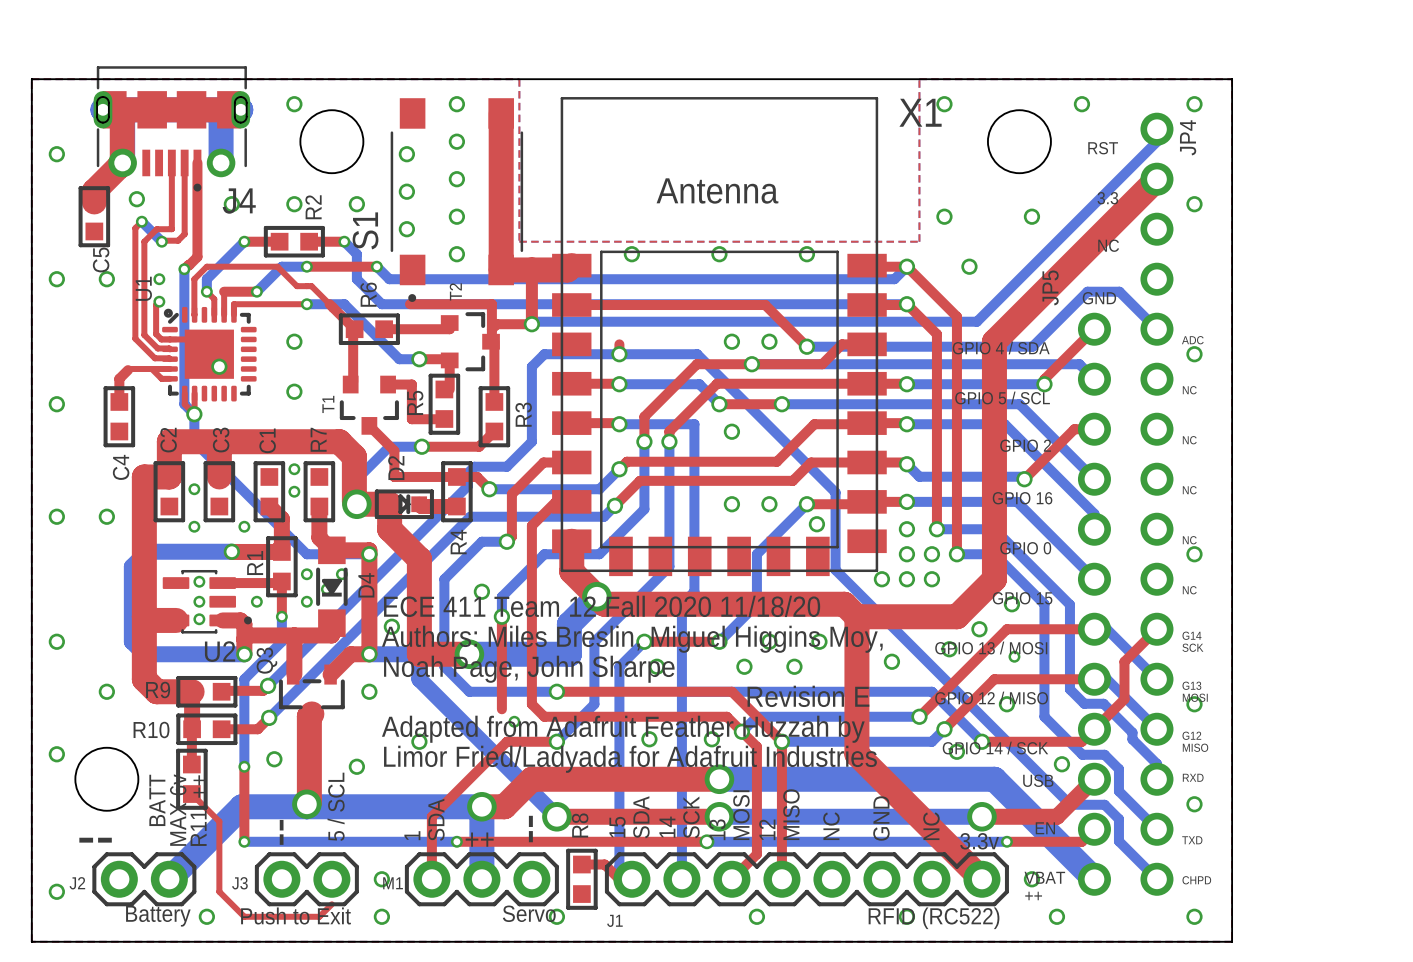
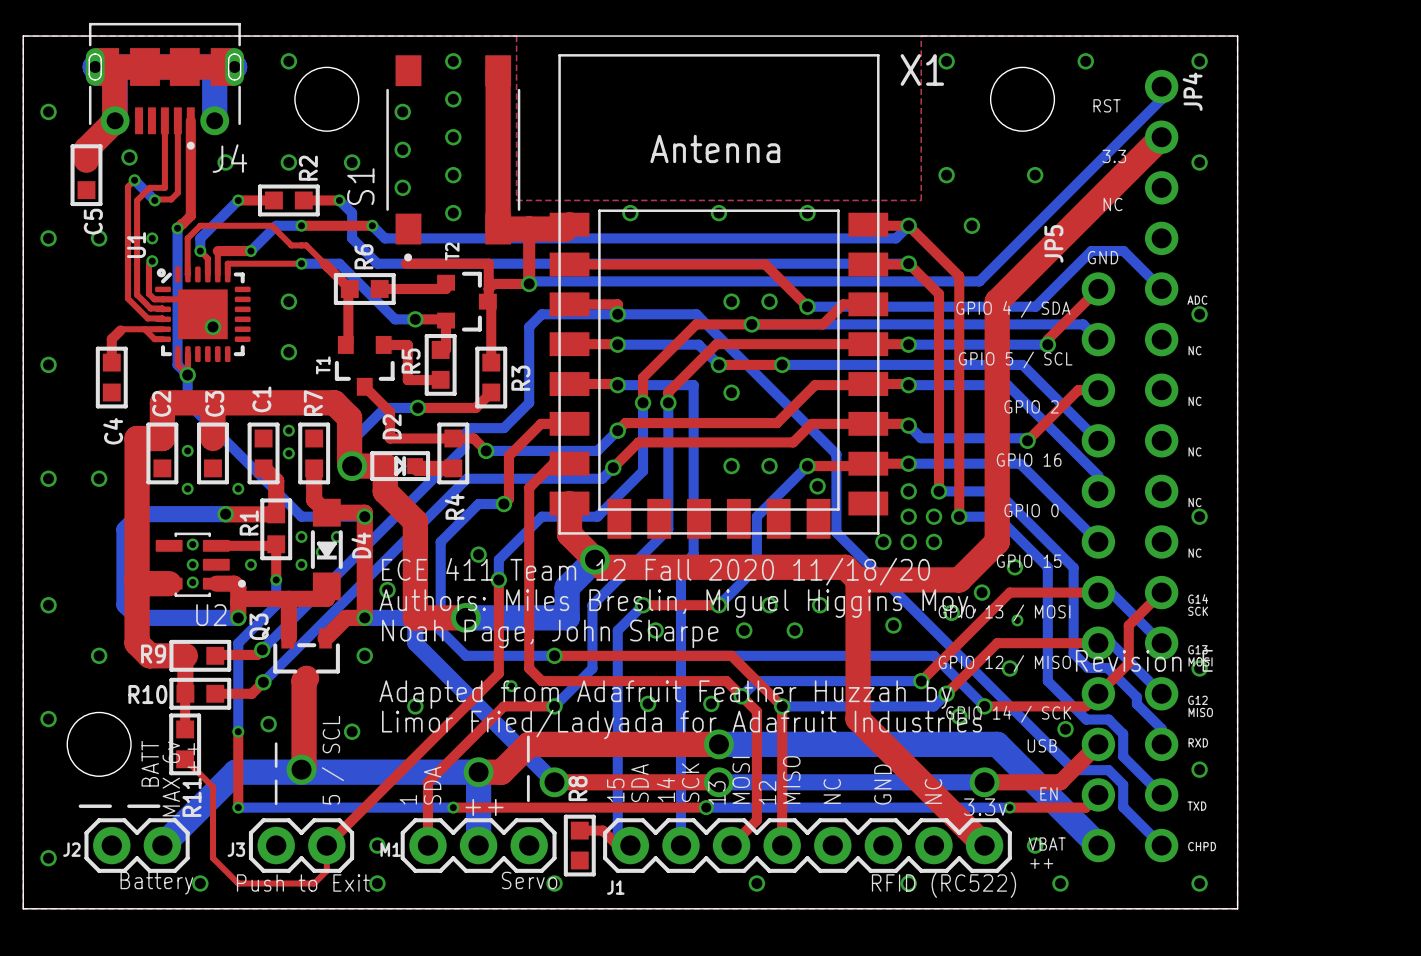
top track: none -> (569, 304) (617, 304)
top track: none -> (498, 673) (326, 845) (326, 870)

